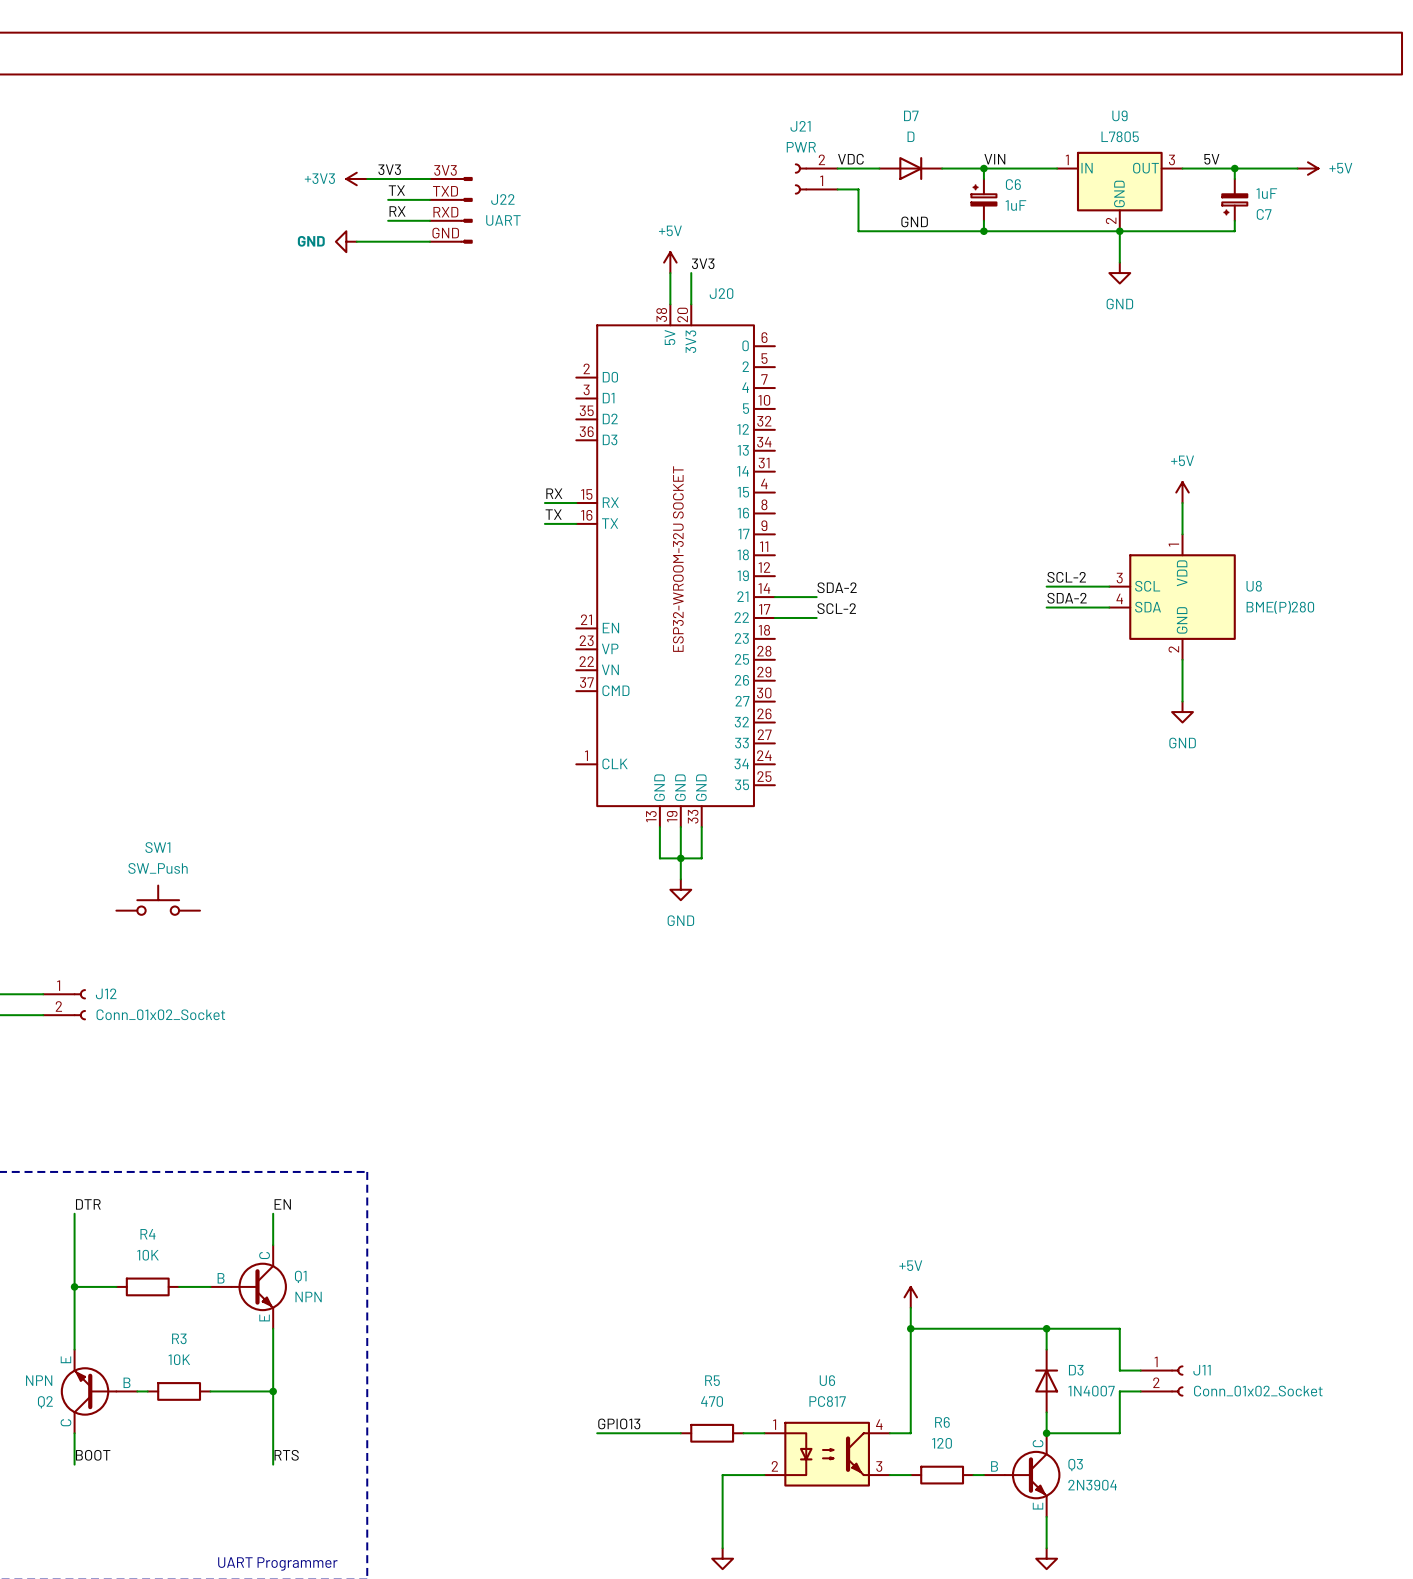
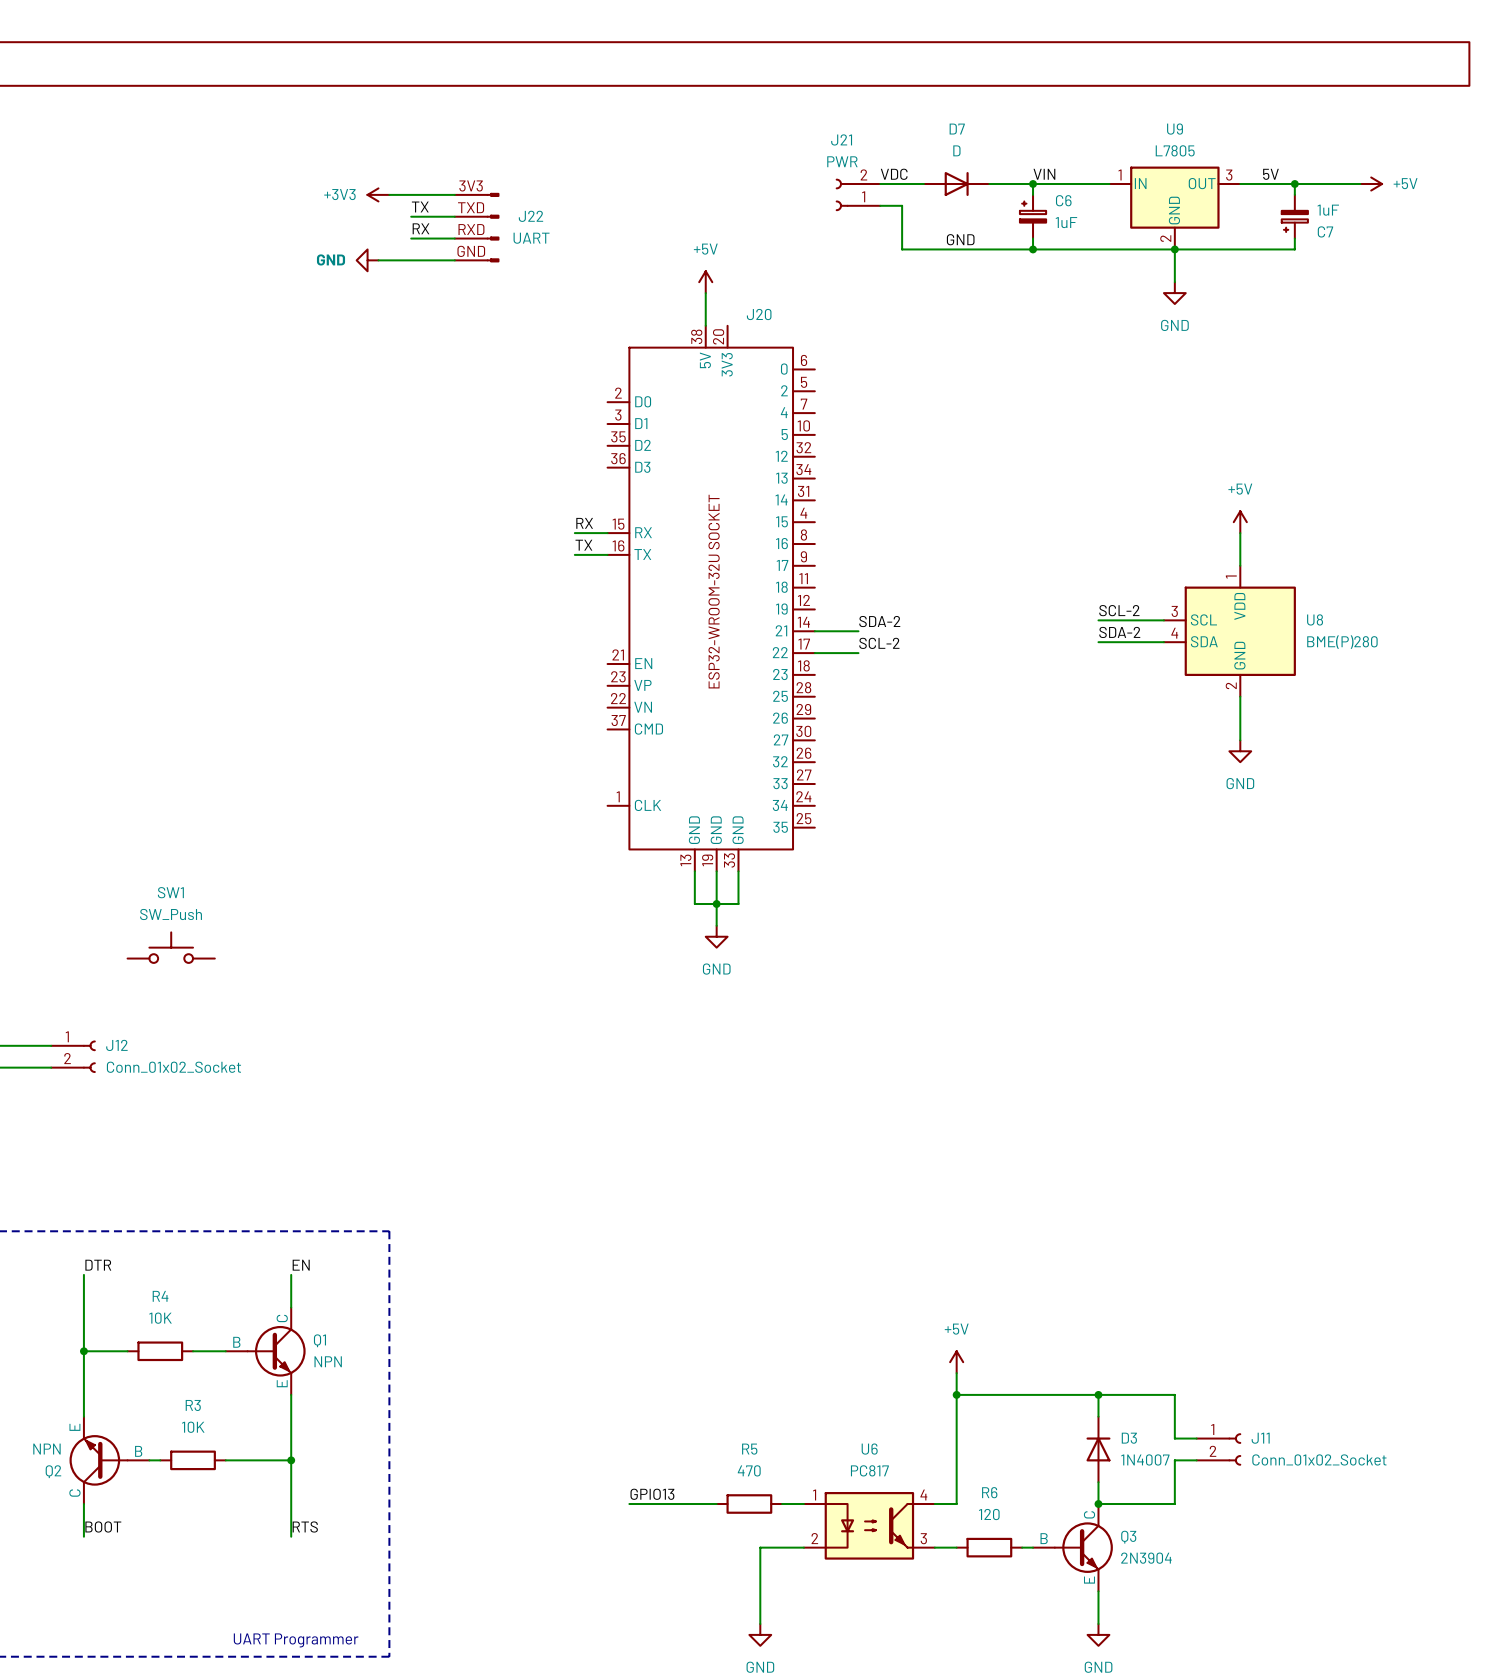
label: 3V3 (389, 169) -> none
label: 3V3 (703, 263) -> none
wire: (691, 273) (691, 304) -> none

